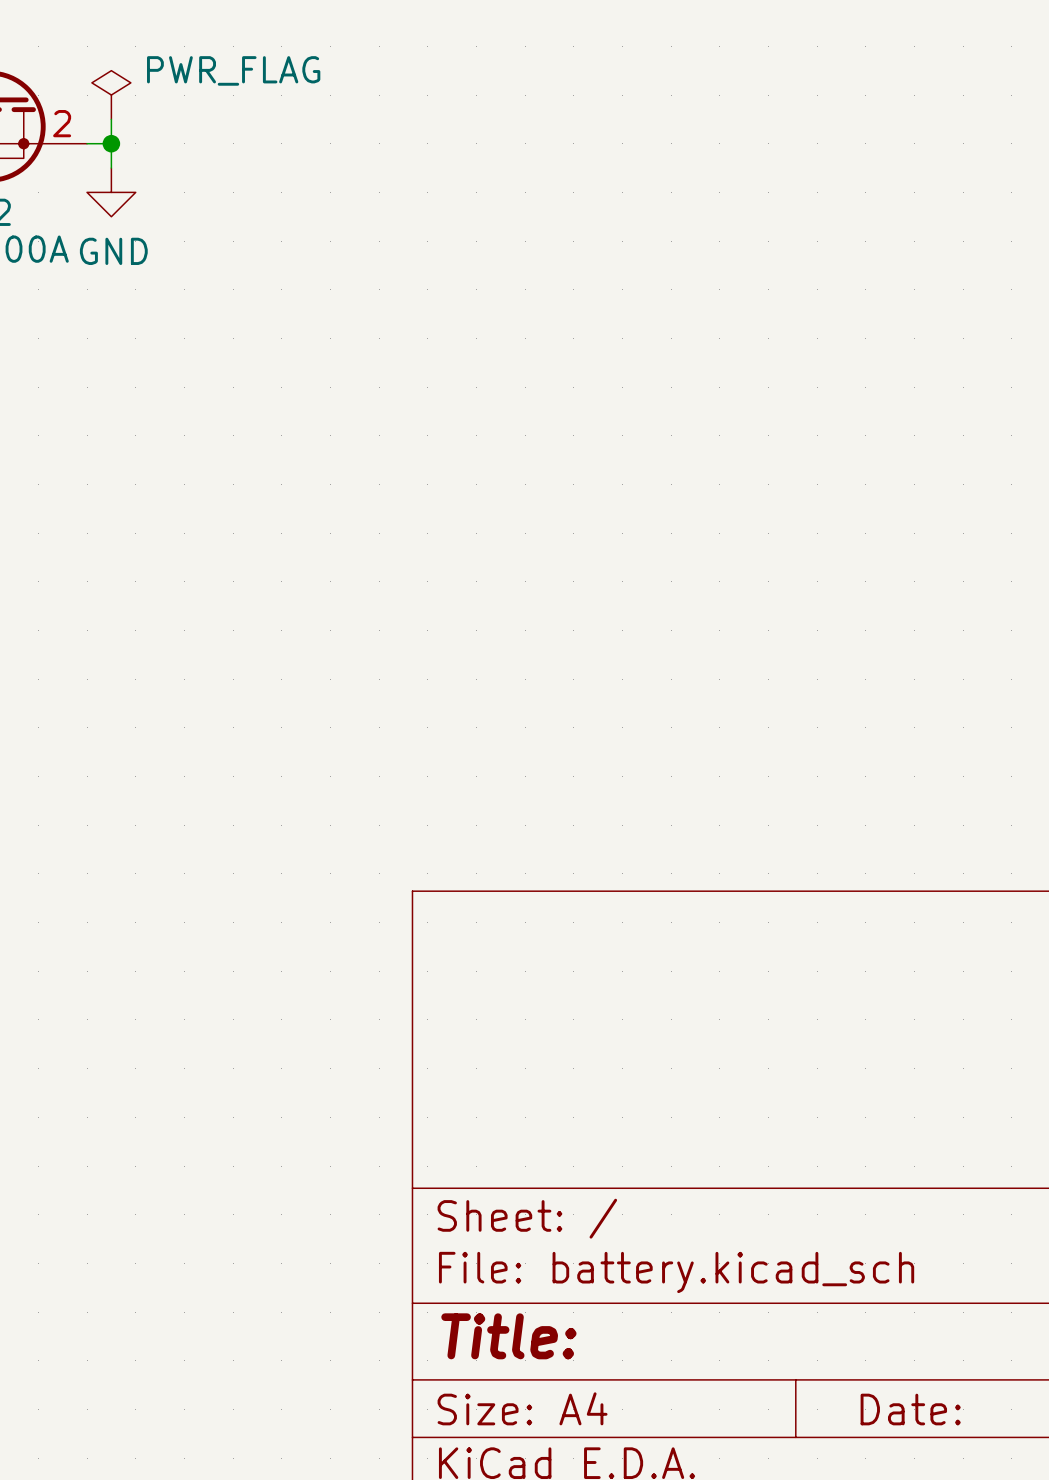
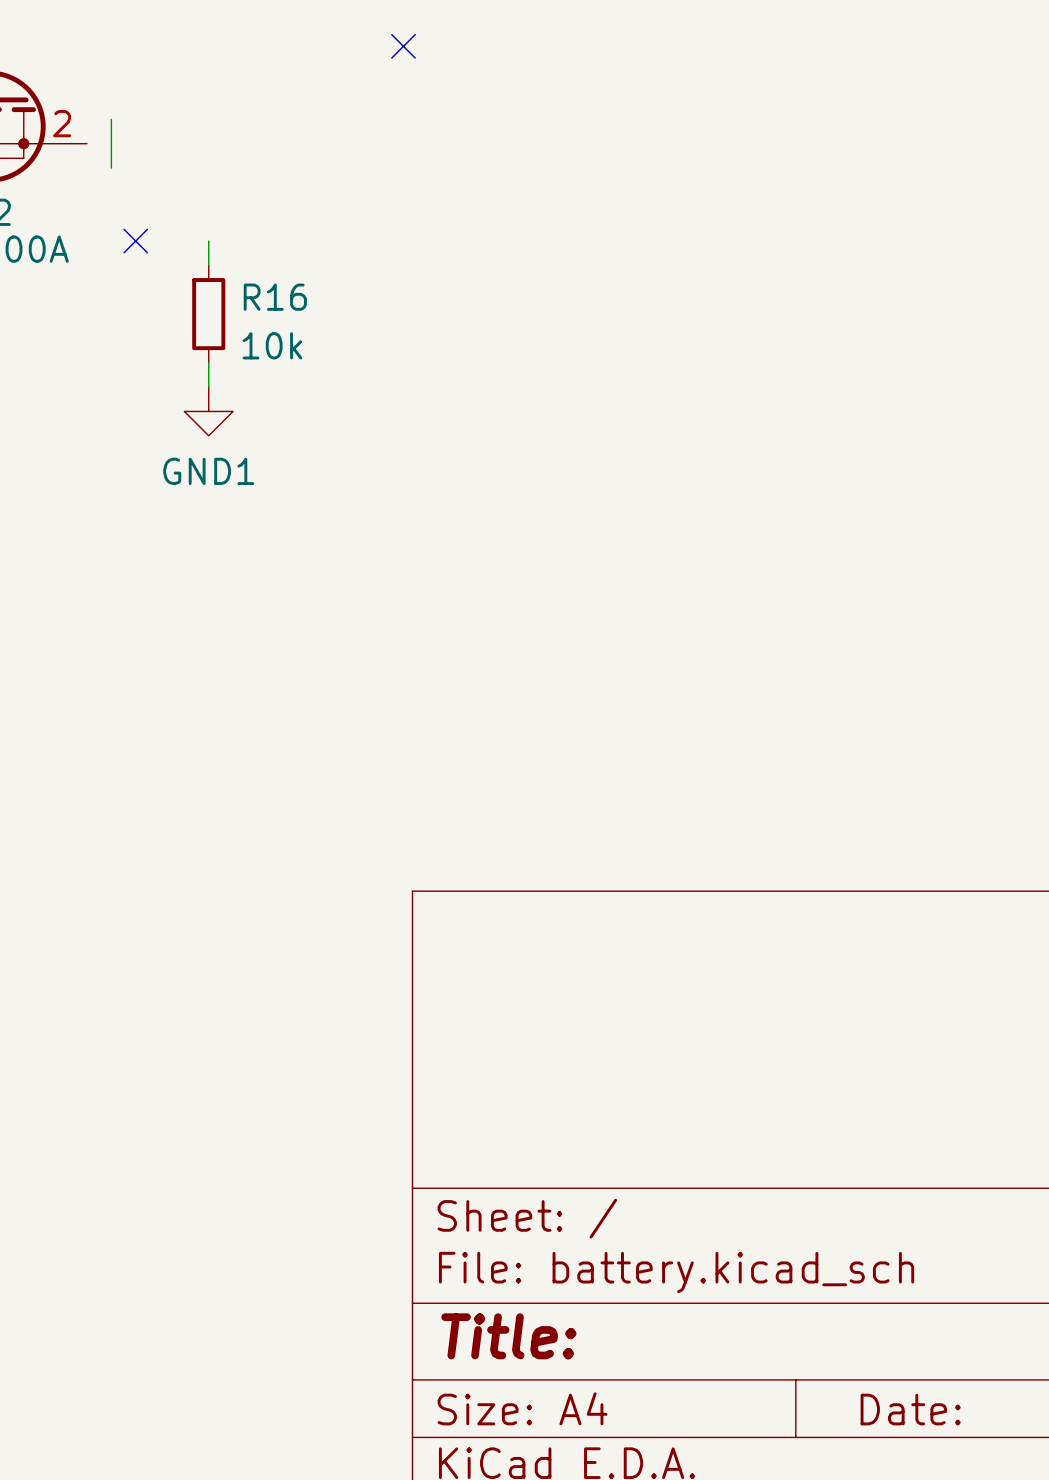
no-connect mark: none -> (403, 46)
power symbol: PWR_FLAG (111, 95) -> none
wire: (87, 143) (111, 143) -> none
junction: (111, 143) -> none
power symbol: GND (111, 192) -> none
no-connect mark: none -> (135, 241)
wire: none -> (208, 241) (208, 265)
R16: none -> 10k (208, 314)
wire: none -> (208, 362) (208, 387)
power symbol: none -> GND1 (208, 411)

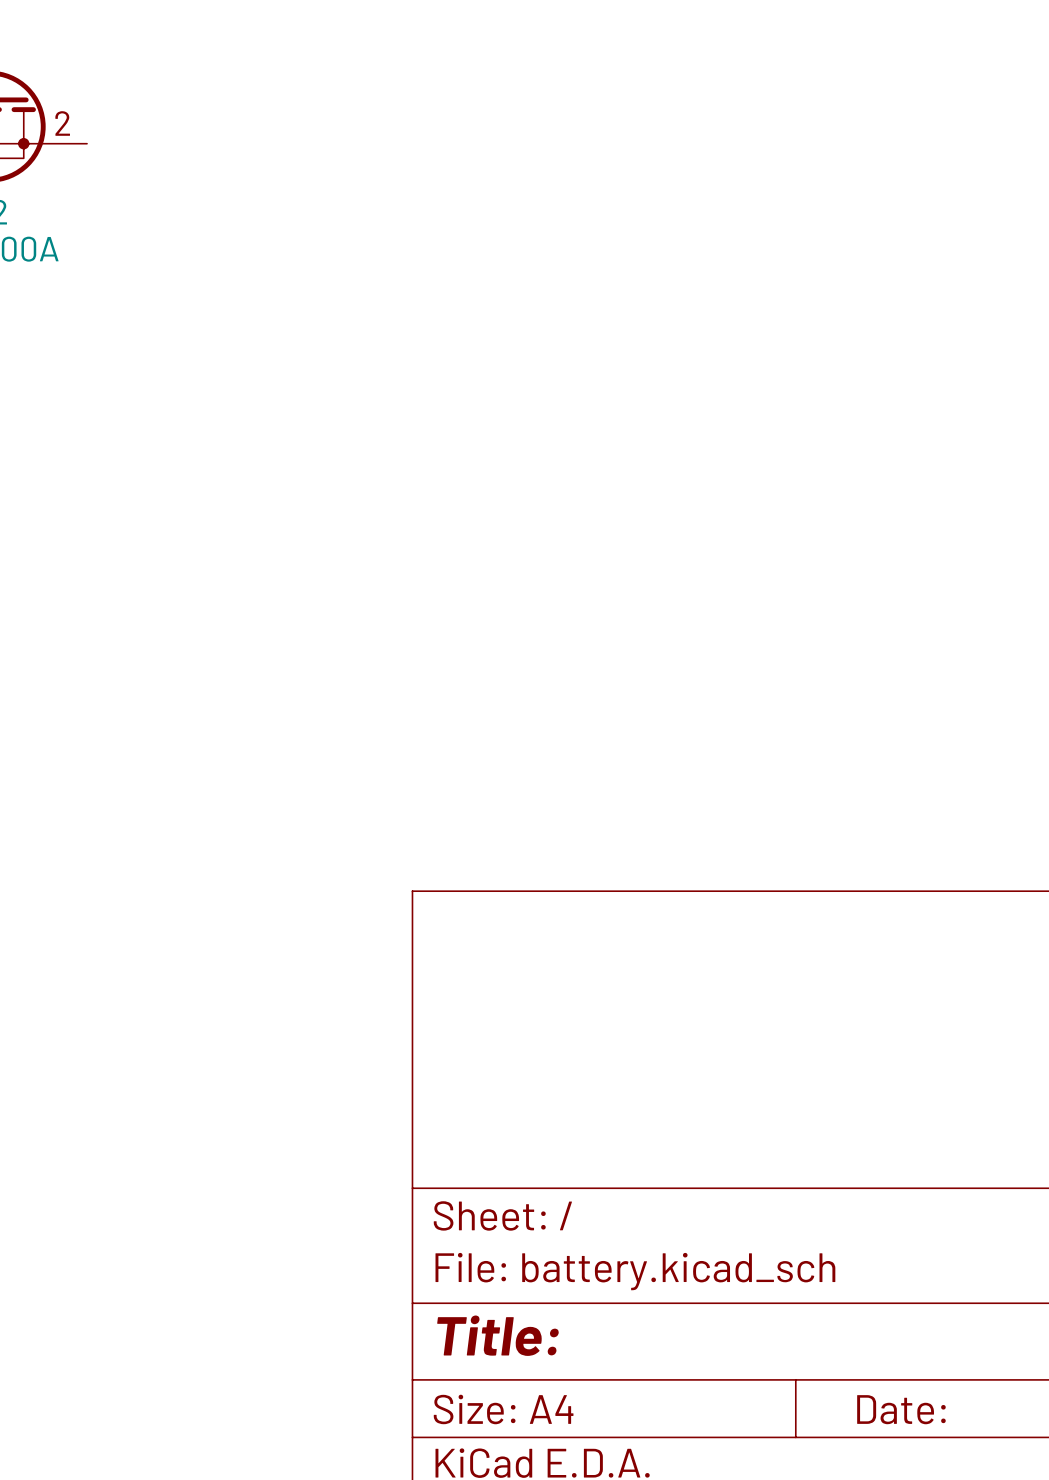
no-connect mark: (403, 46) -> none
wire: (111, 119) (111, 168) -> none
no-connect mark: (135, 241) -> none
wire: (208, 241) (208, 265) -> none
R16: 10k (208, 314) -> none
wire: (208, 362) (208, 387) -> none
power symbol: GND1 (208, 411) -> none

